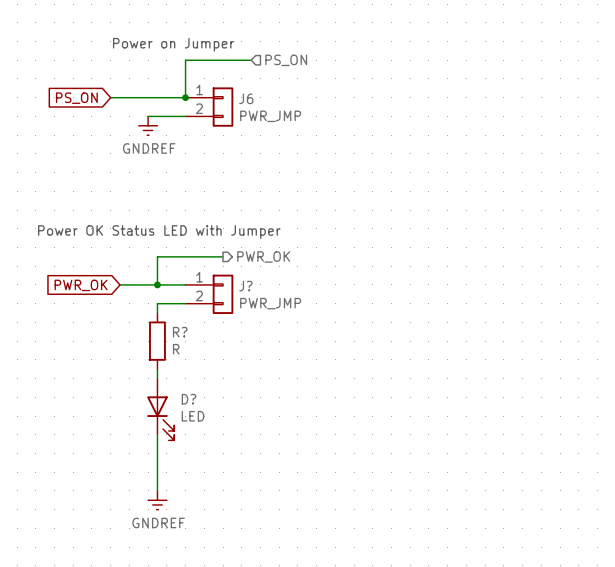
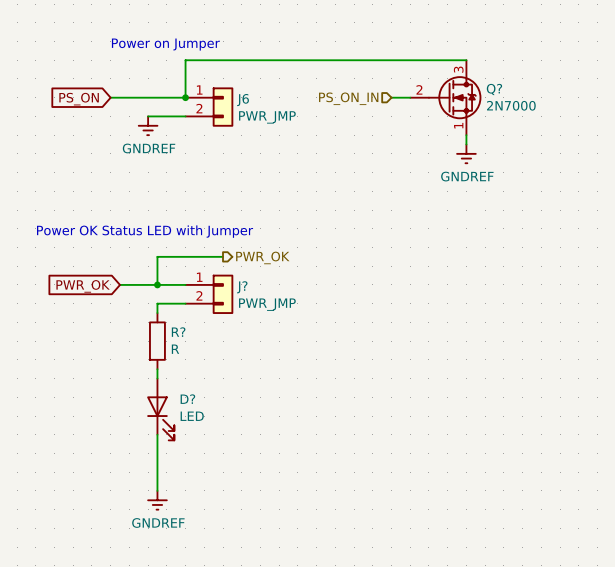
wire: none -> (251, 60) (466, 60)
hierarchical label: PS_ON (286, 60) -> none
hierarchical label: none -> PS_ON_IN (348, 98)
wire: none -> (391, 97) (410, 97)
Q?: none -> 2N7000 (445, 97)
wire: none -> (466, 135) (466, 144)
power symbol: none -> GNDREF (466, 153)

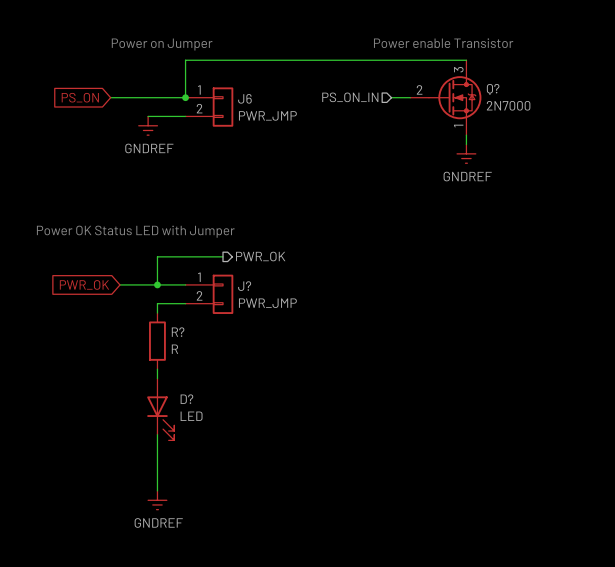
text: none -> Power enable Transistor (443, 43)

